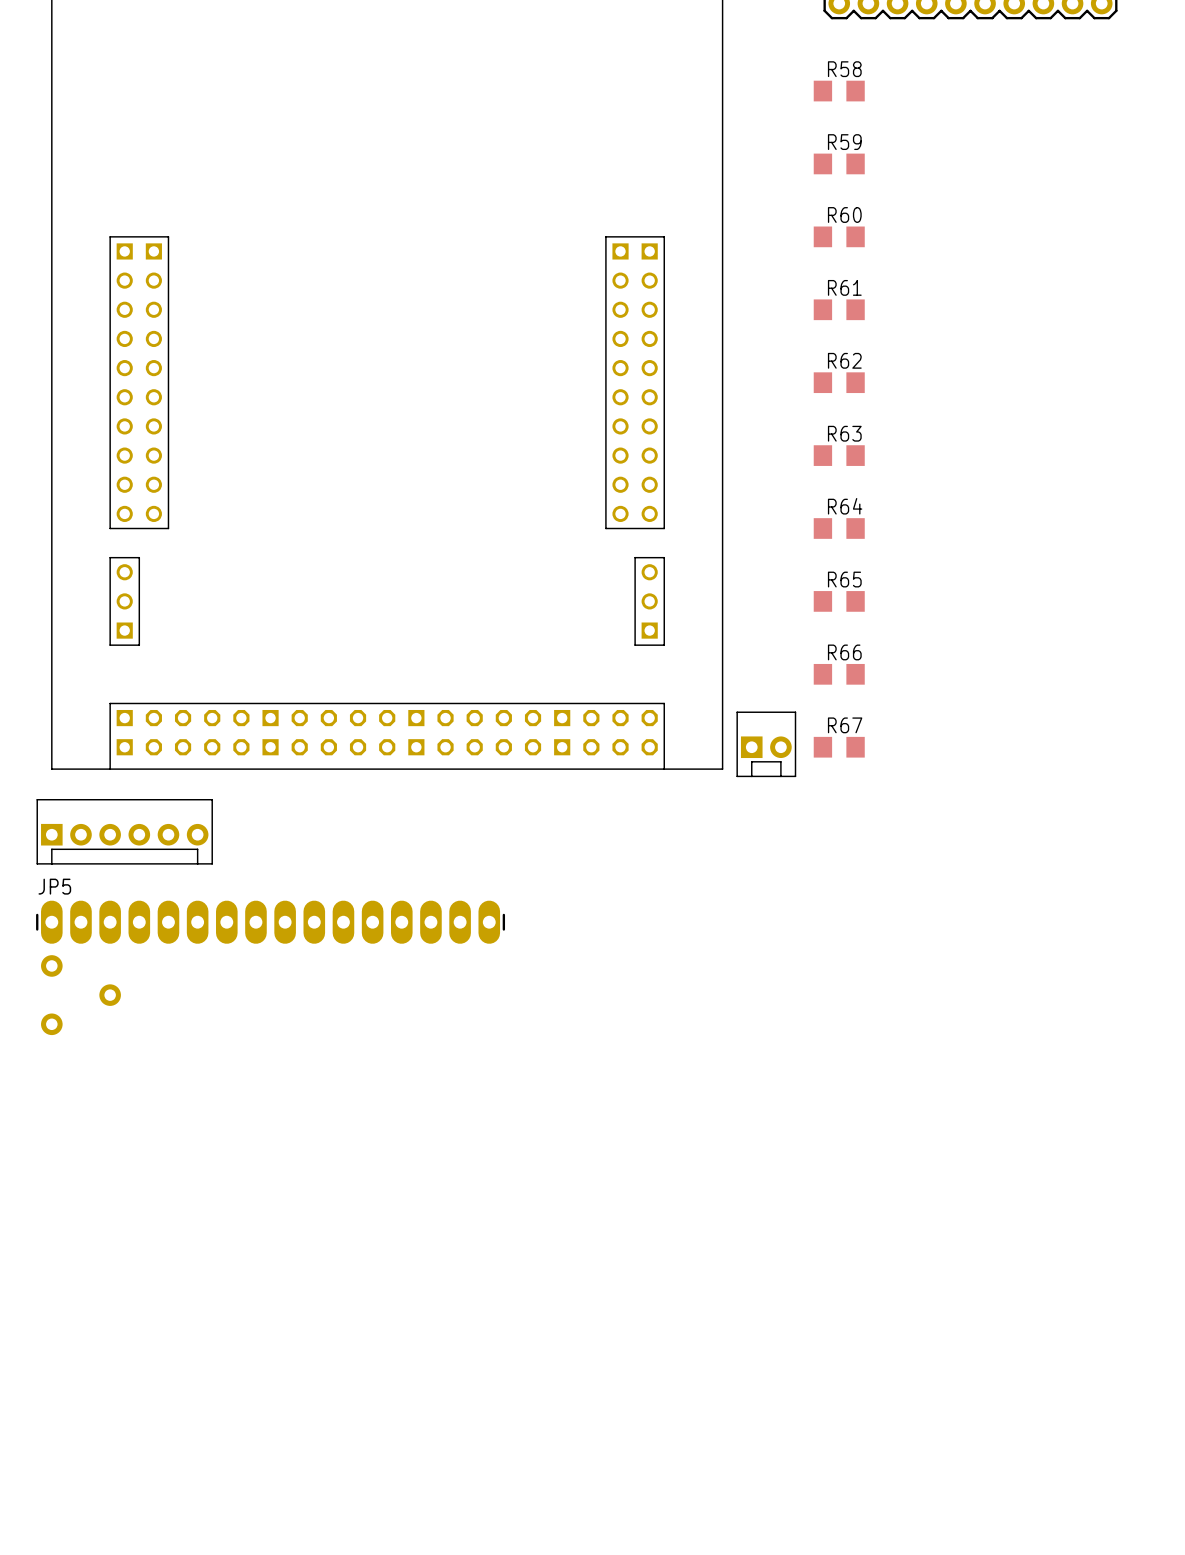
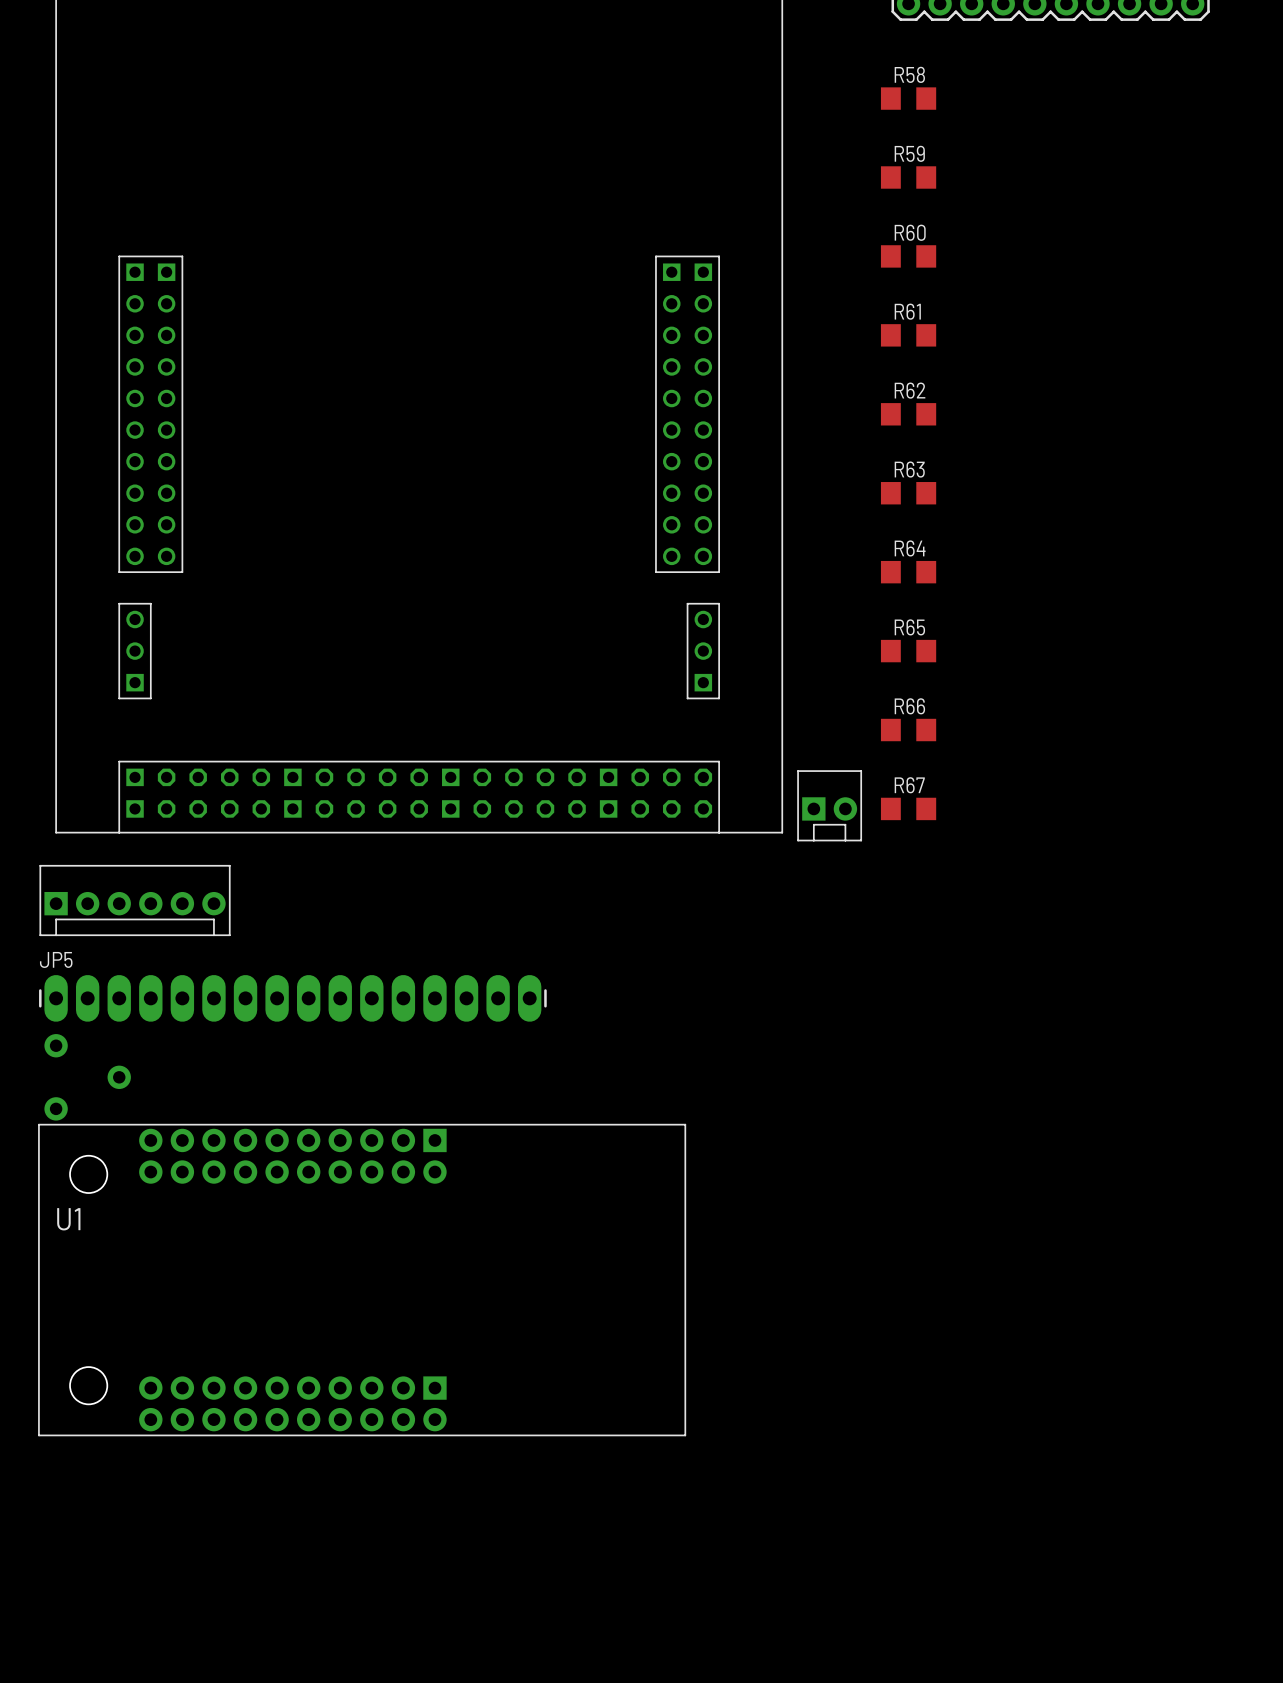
U1: none -> (362, 1280)

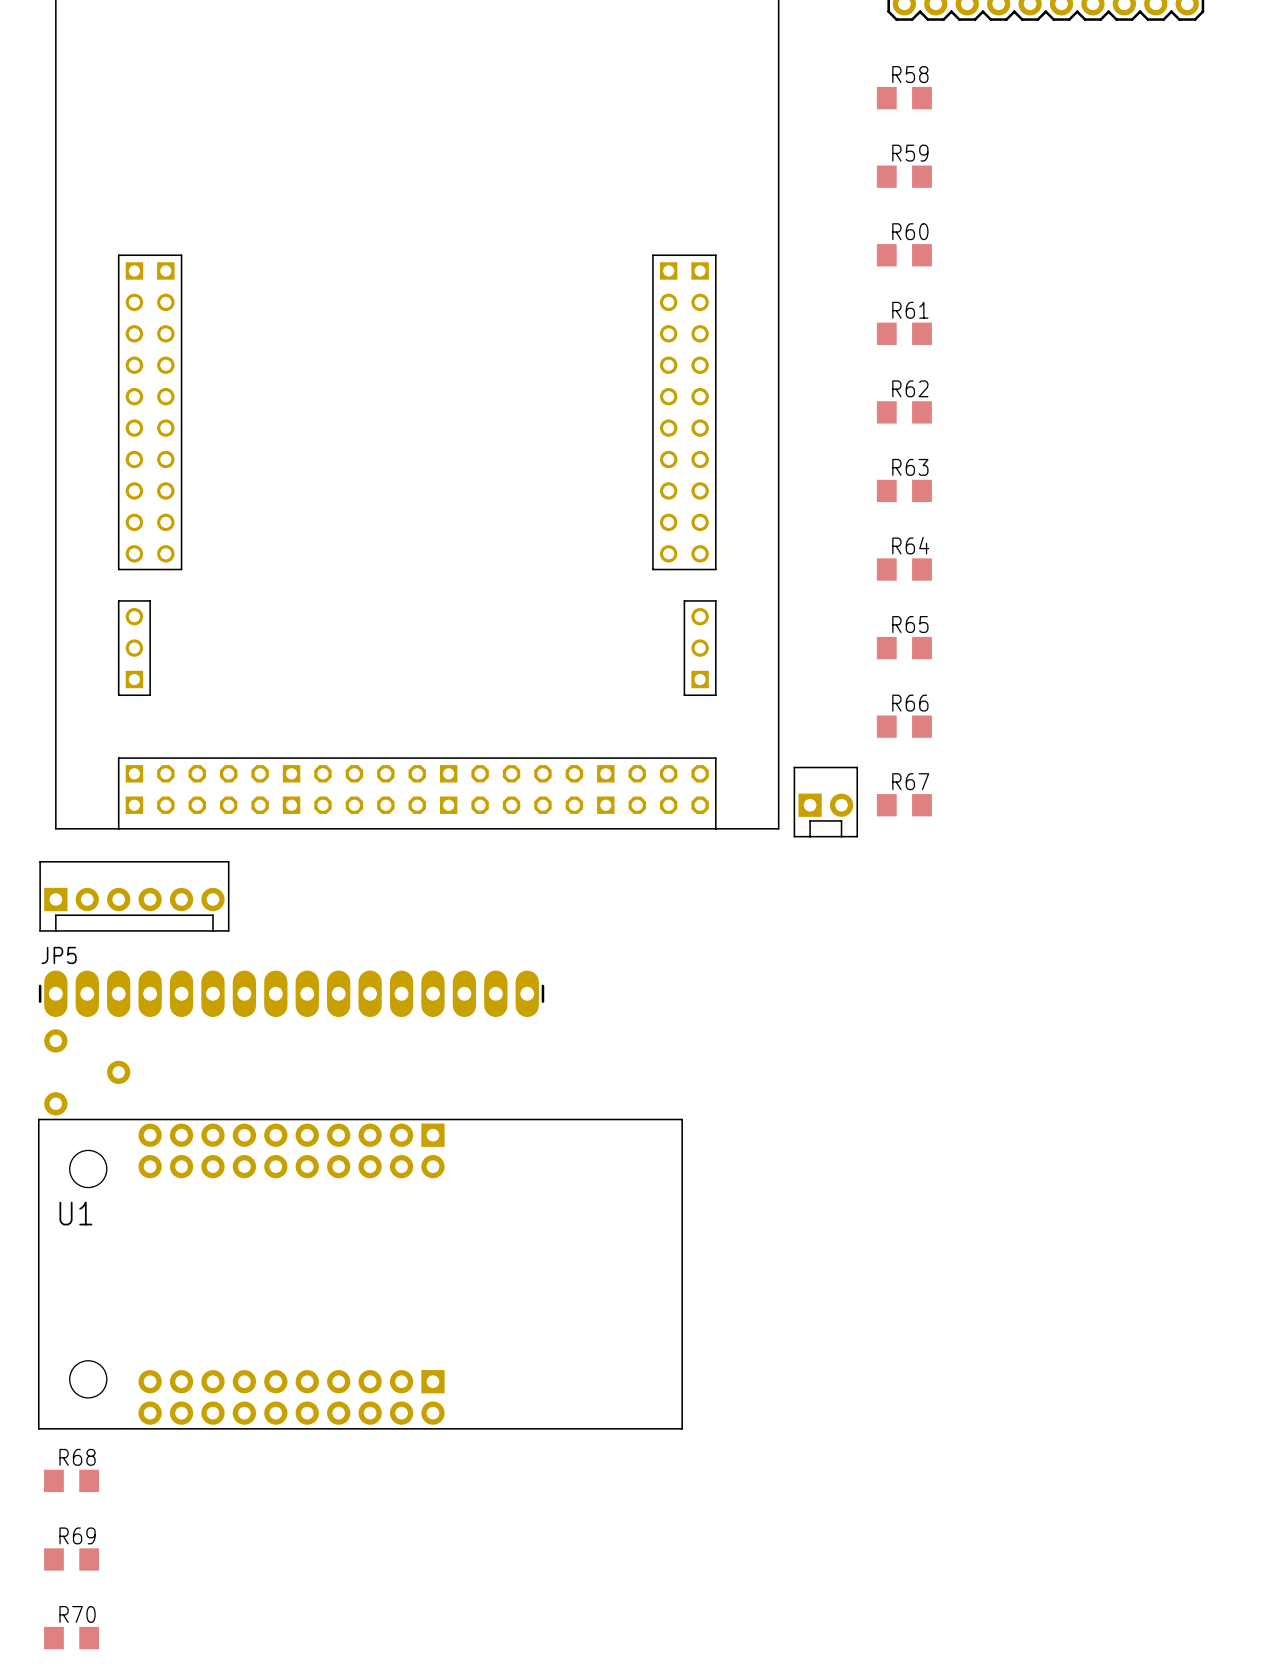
R68: none -> (71, 1480)
R69: none -> (71, 1559)
R70: none -> (71, 1638)

